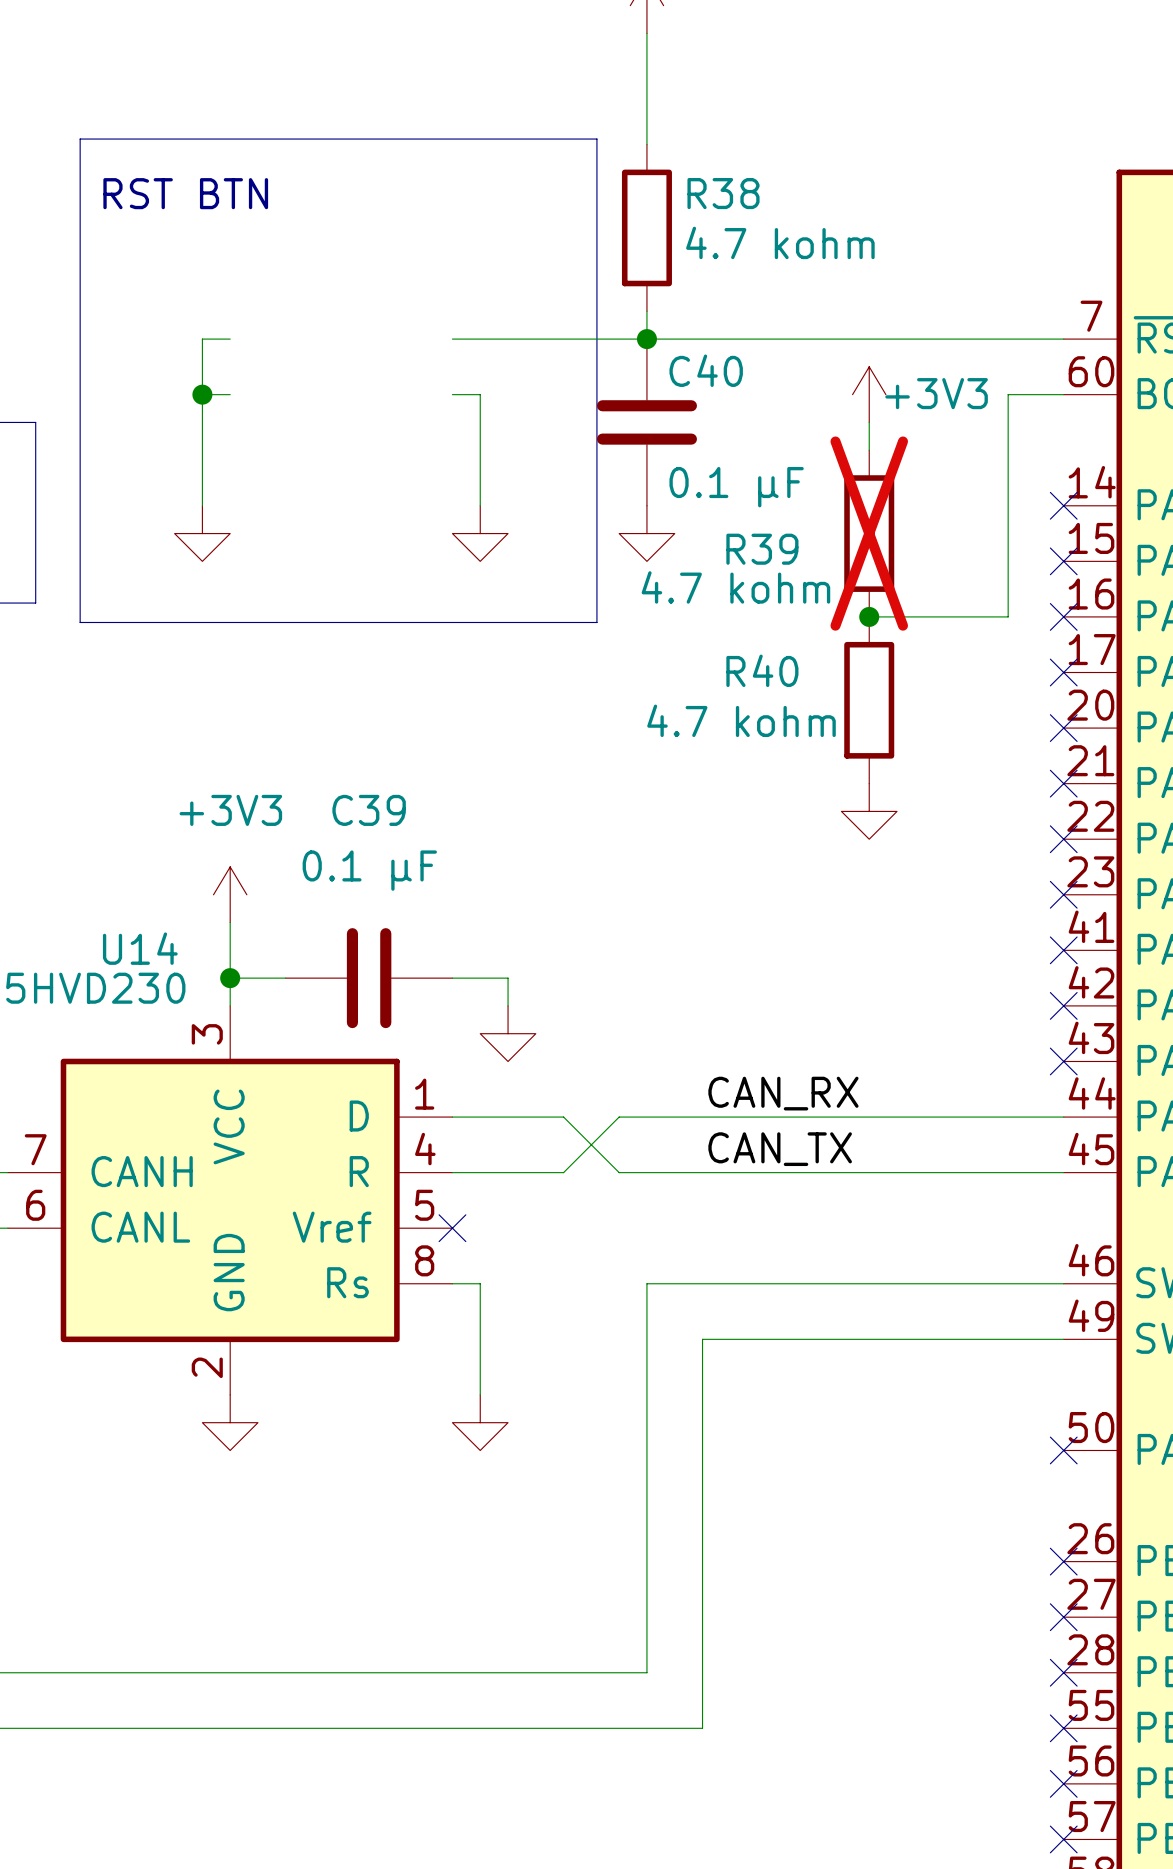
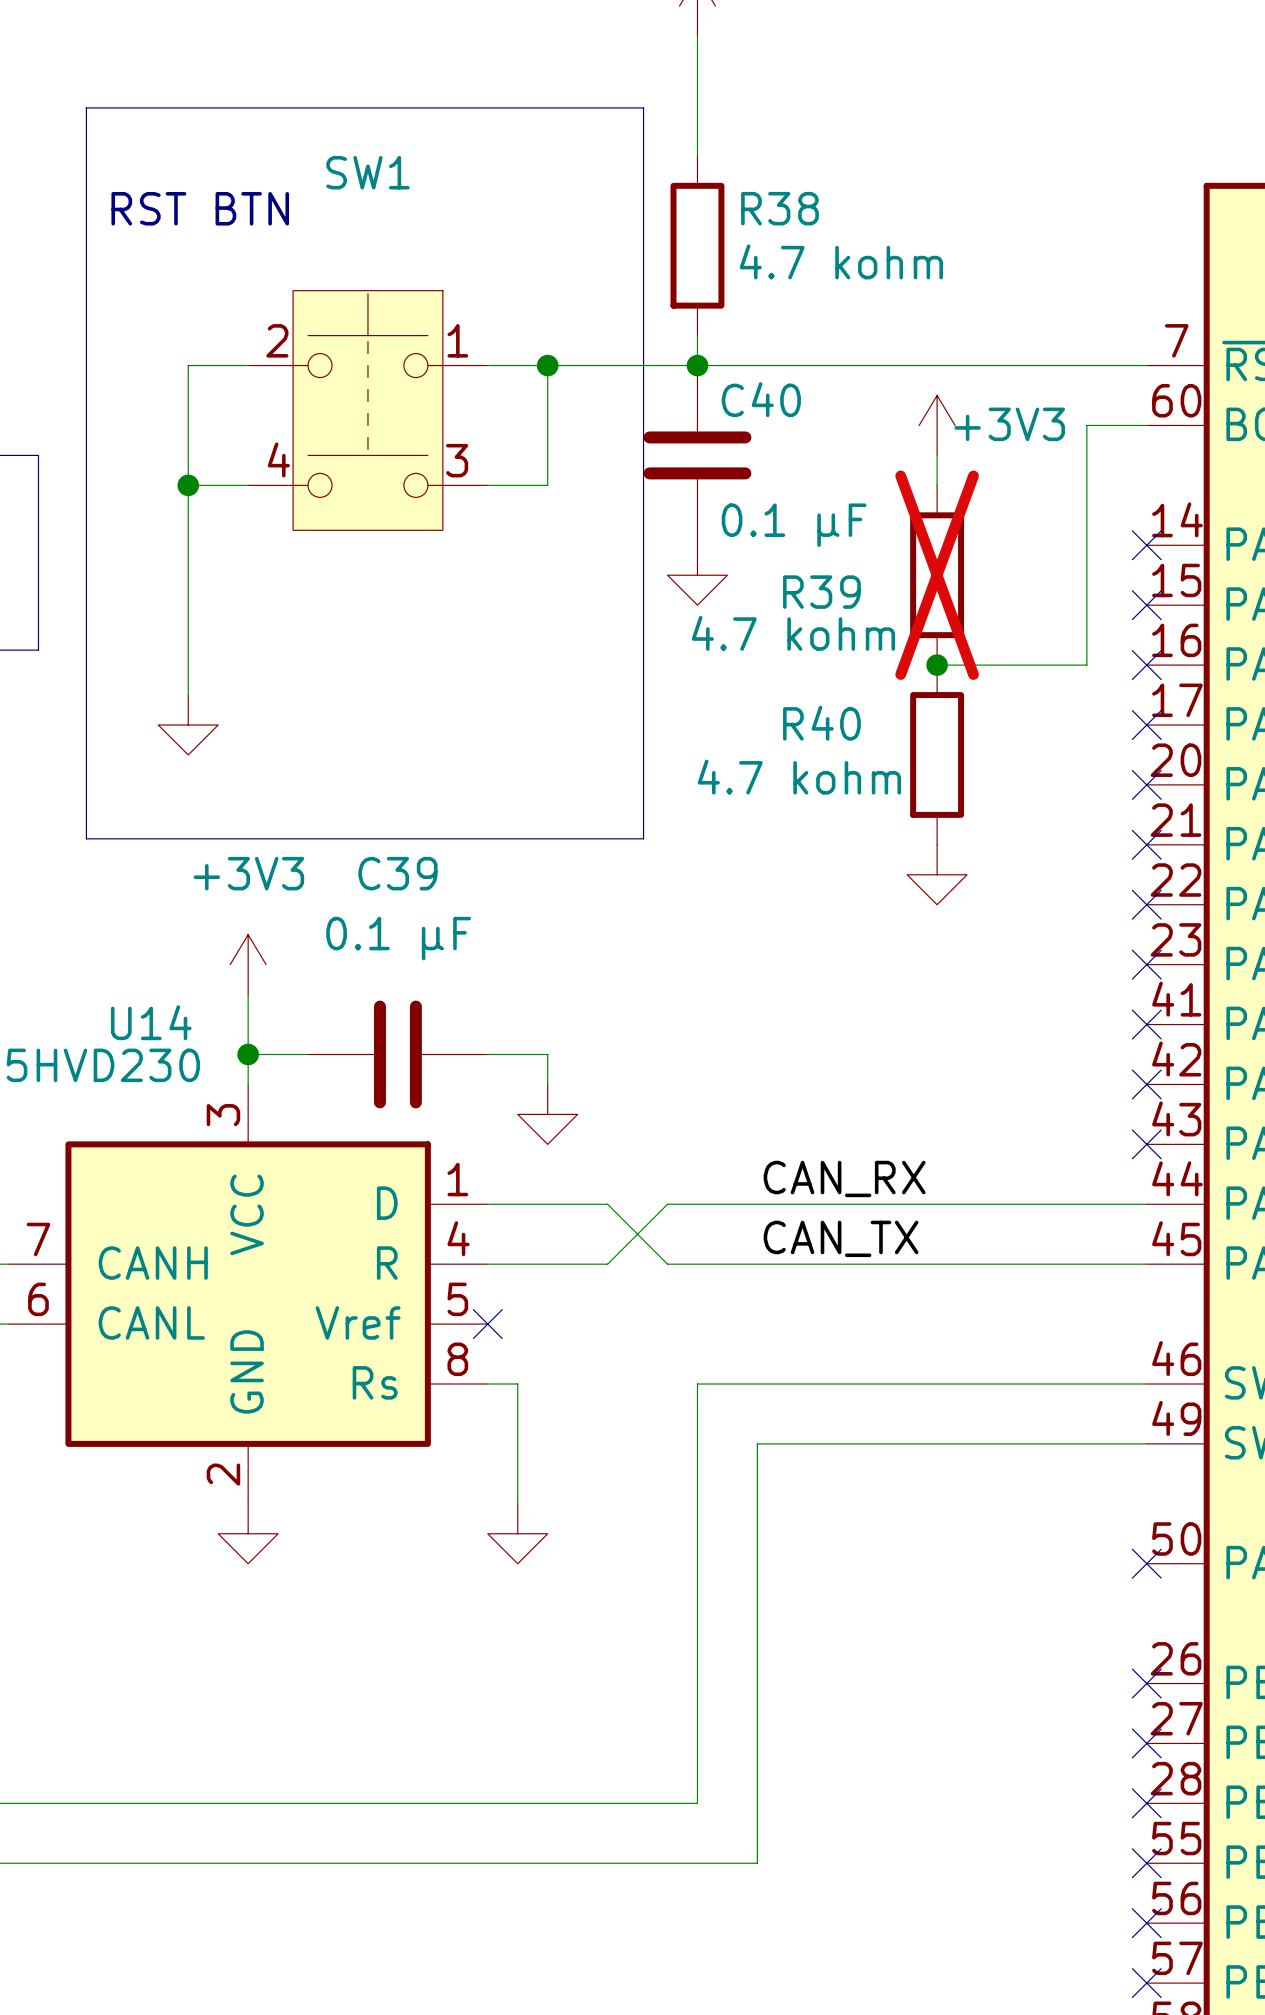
line: (80, 139) (596, 139) -> (86, 149) (86, 107) (643, 107) (643, 149)
wire: (202, 339) (202, 505) -> (218, 365) (188, 365) (188, 695)
wire: none -> (547, 365) (547, 485) (487, 485)
junction: none -> (547, 365)
SW1: none -> (367, 410)
wire: (202, 394) (230, 394) -> none
junction position: (202, 394) -> (188, 485)
wire: (452, 394) (480, 394) (480, 505) -> none
wire: none -> (188, 485) (248, 485)
power symbol position: (202, 533) -> (188, 725)
power symbol: (480, 533) -> none
line: (80, 622) (596, 622) -> (86, 671) (86, 838) (643, 838) (643, 671)

